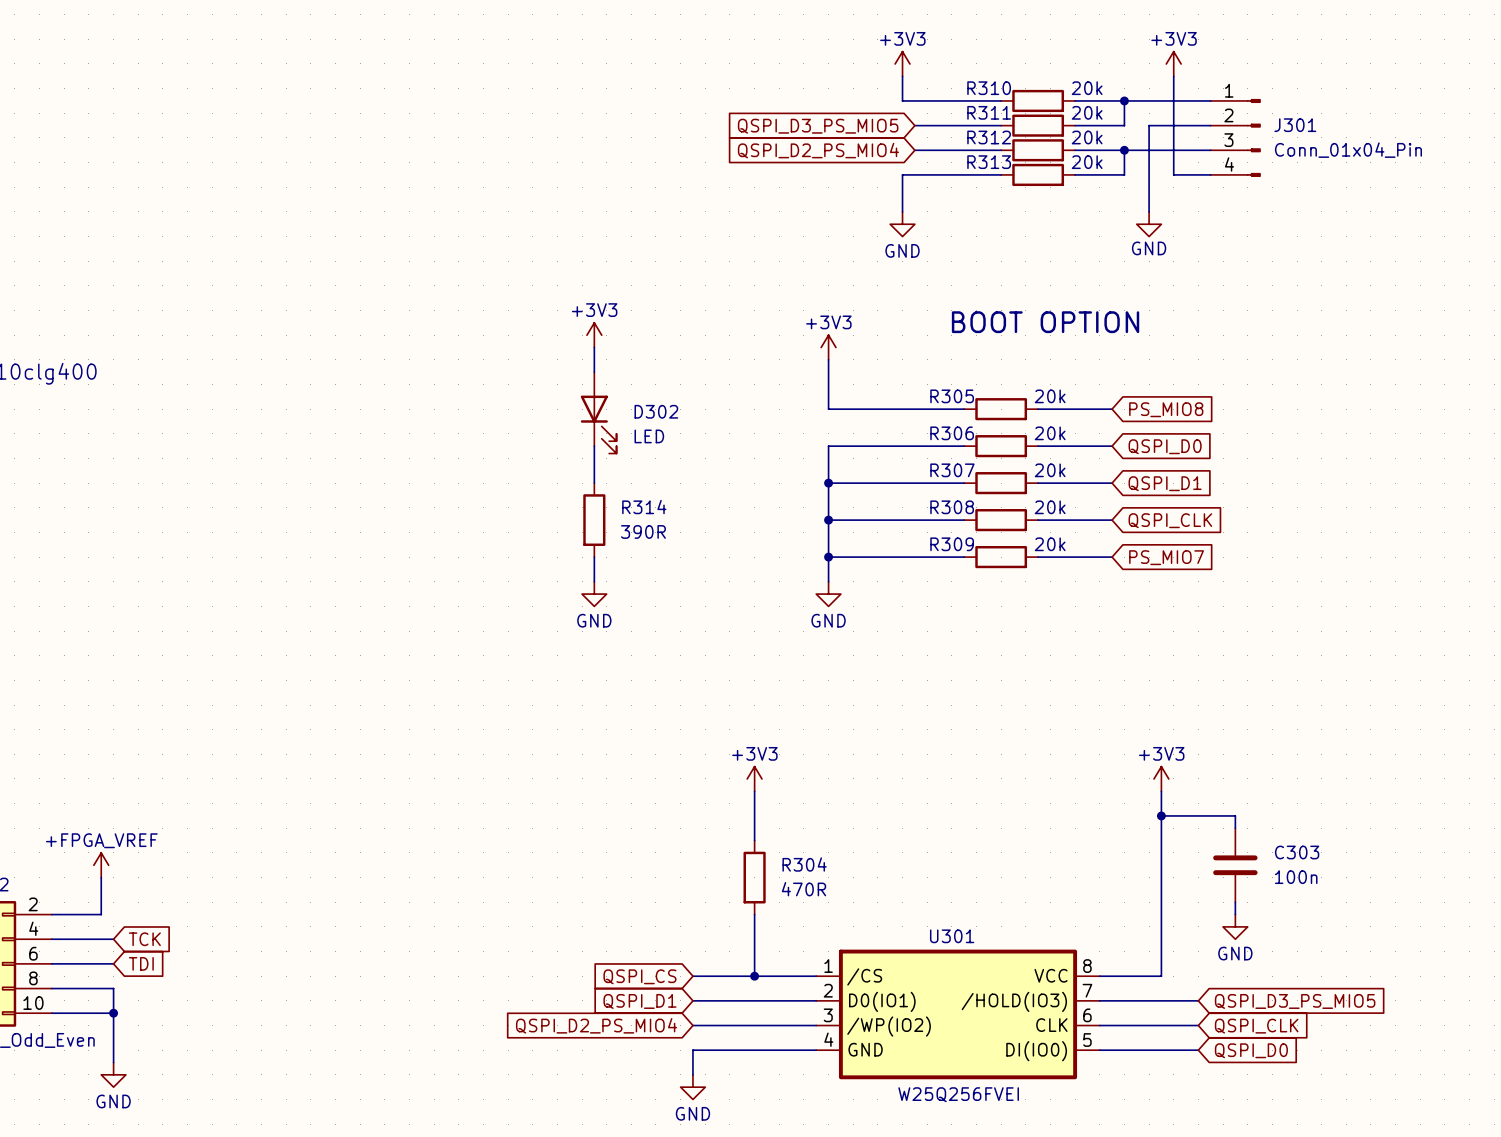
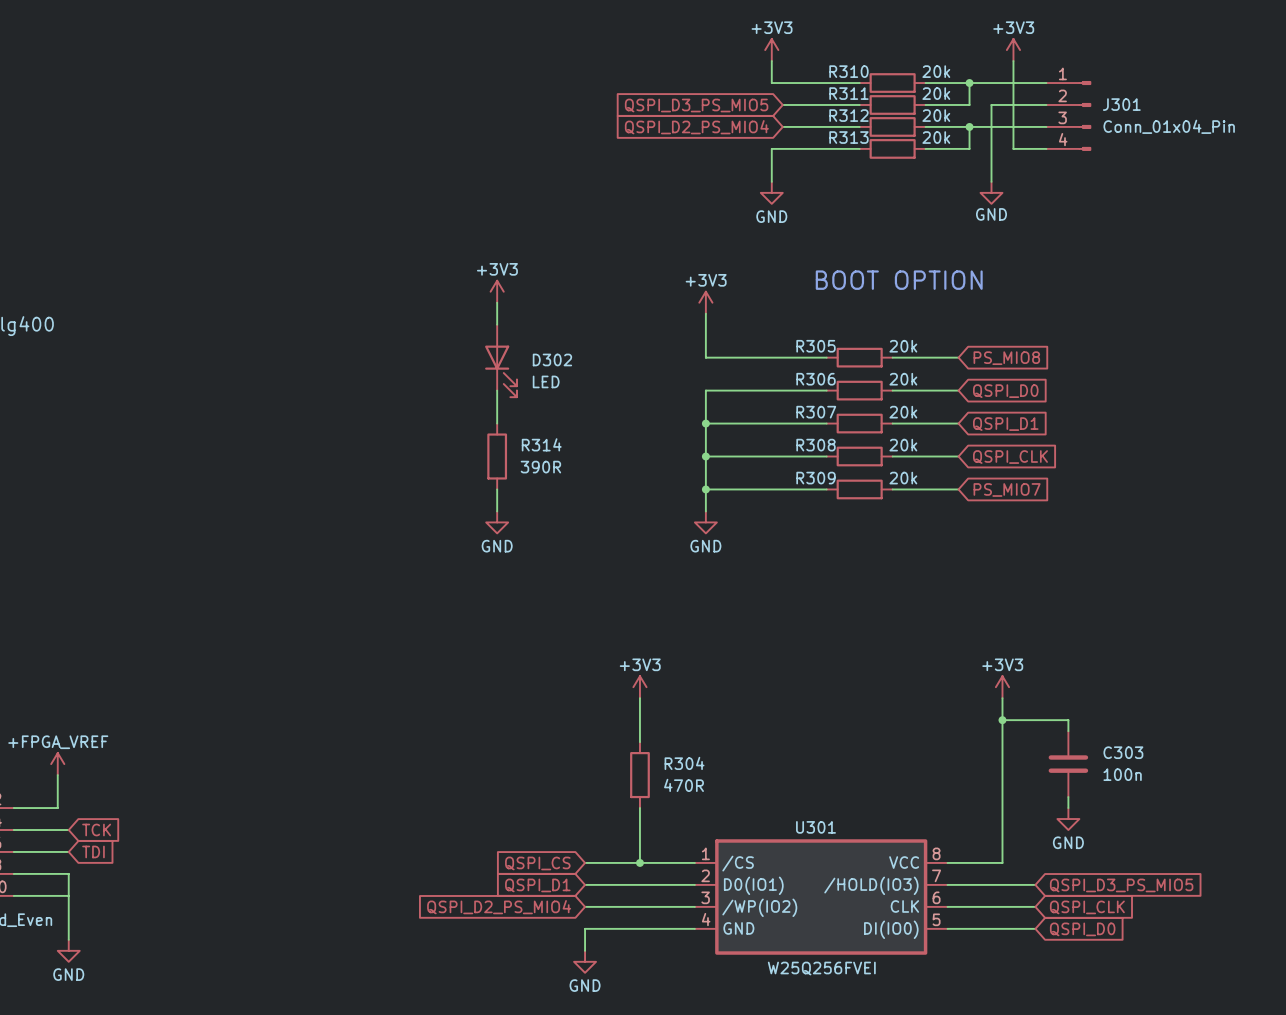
junction: (113, 1013) -> none

